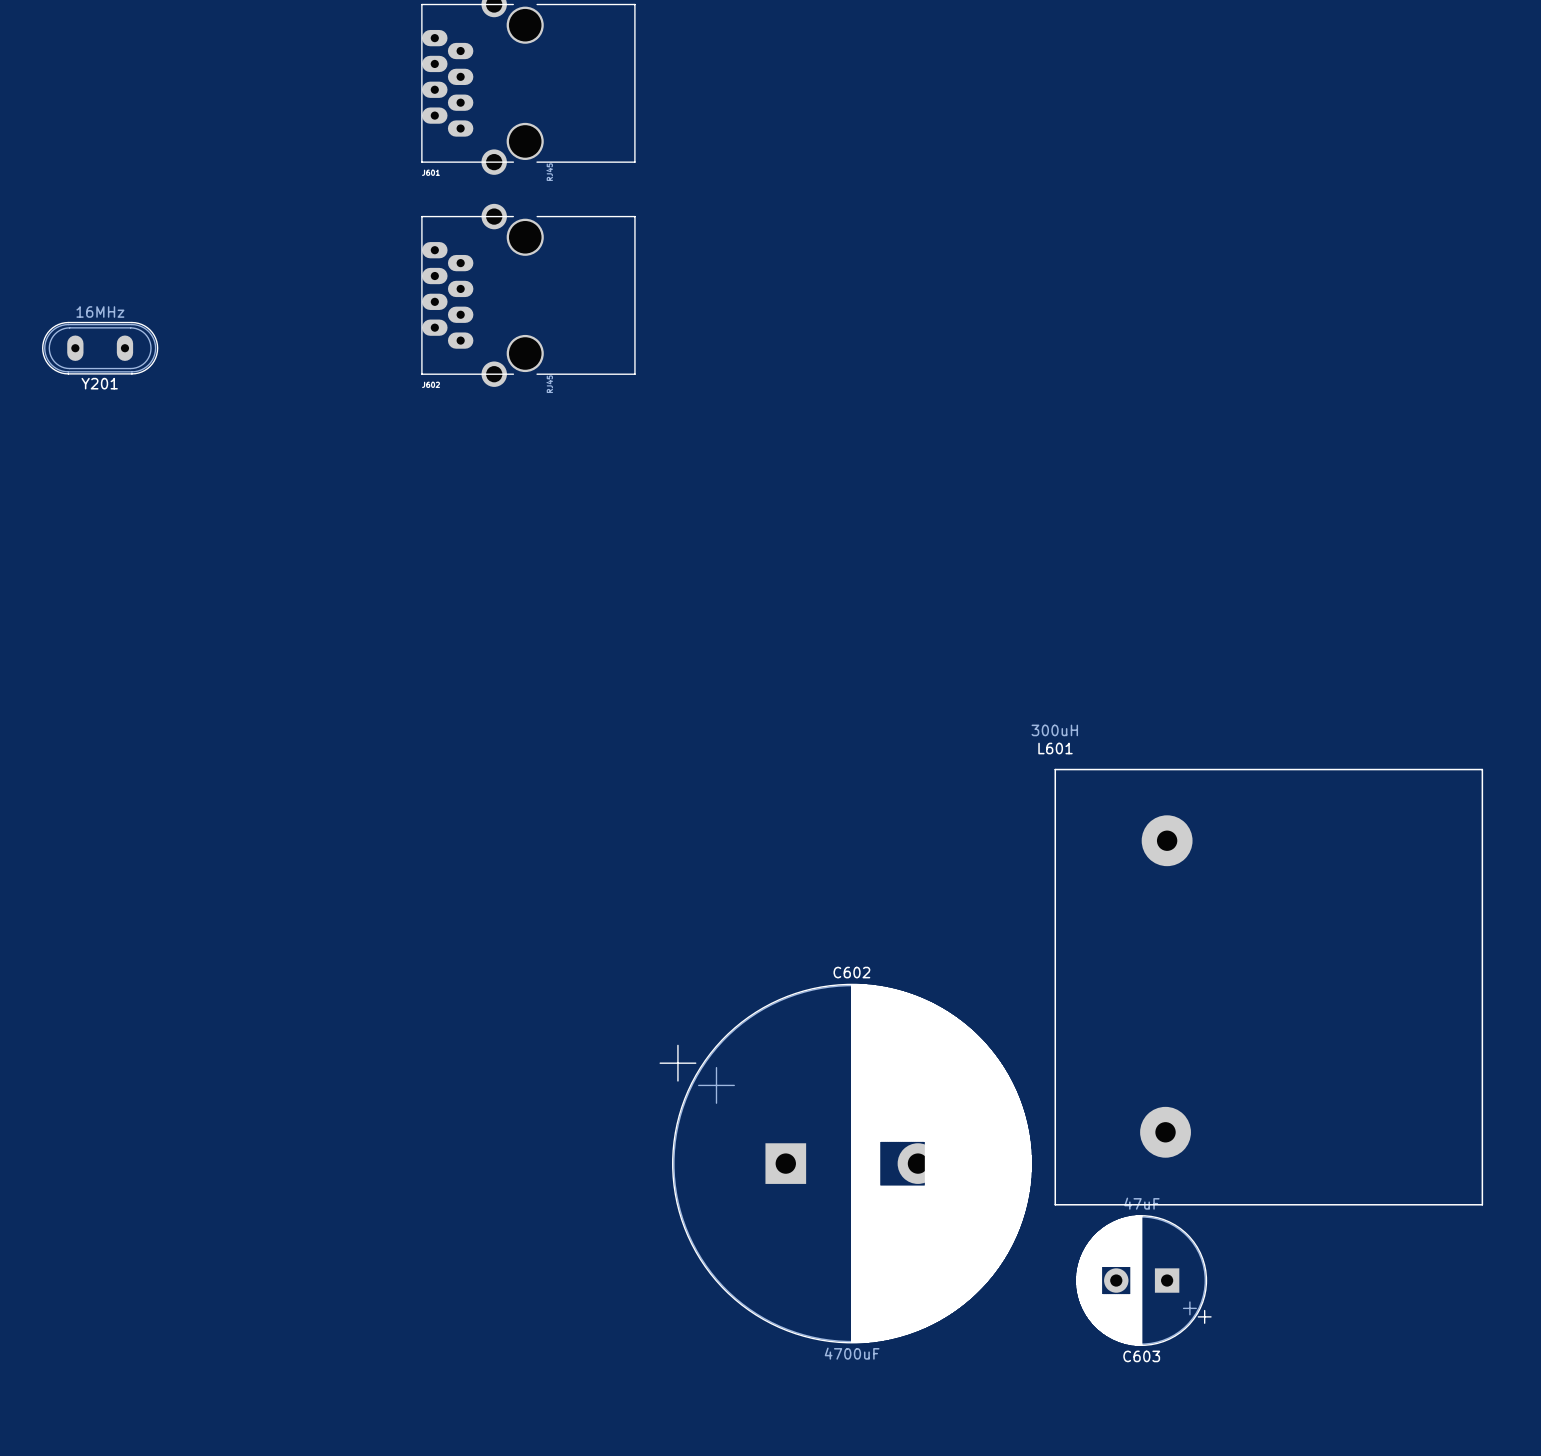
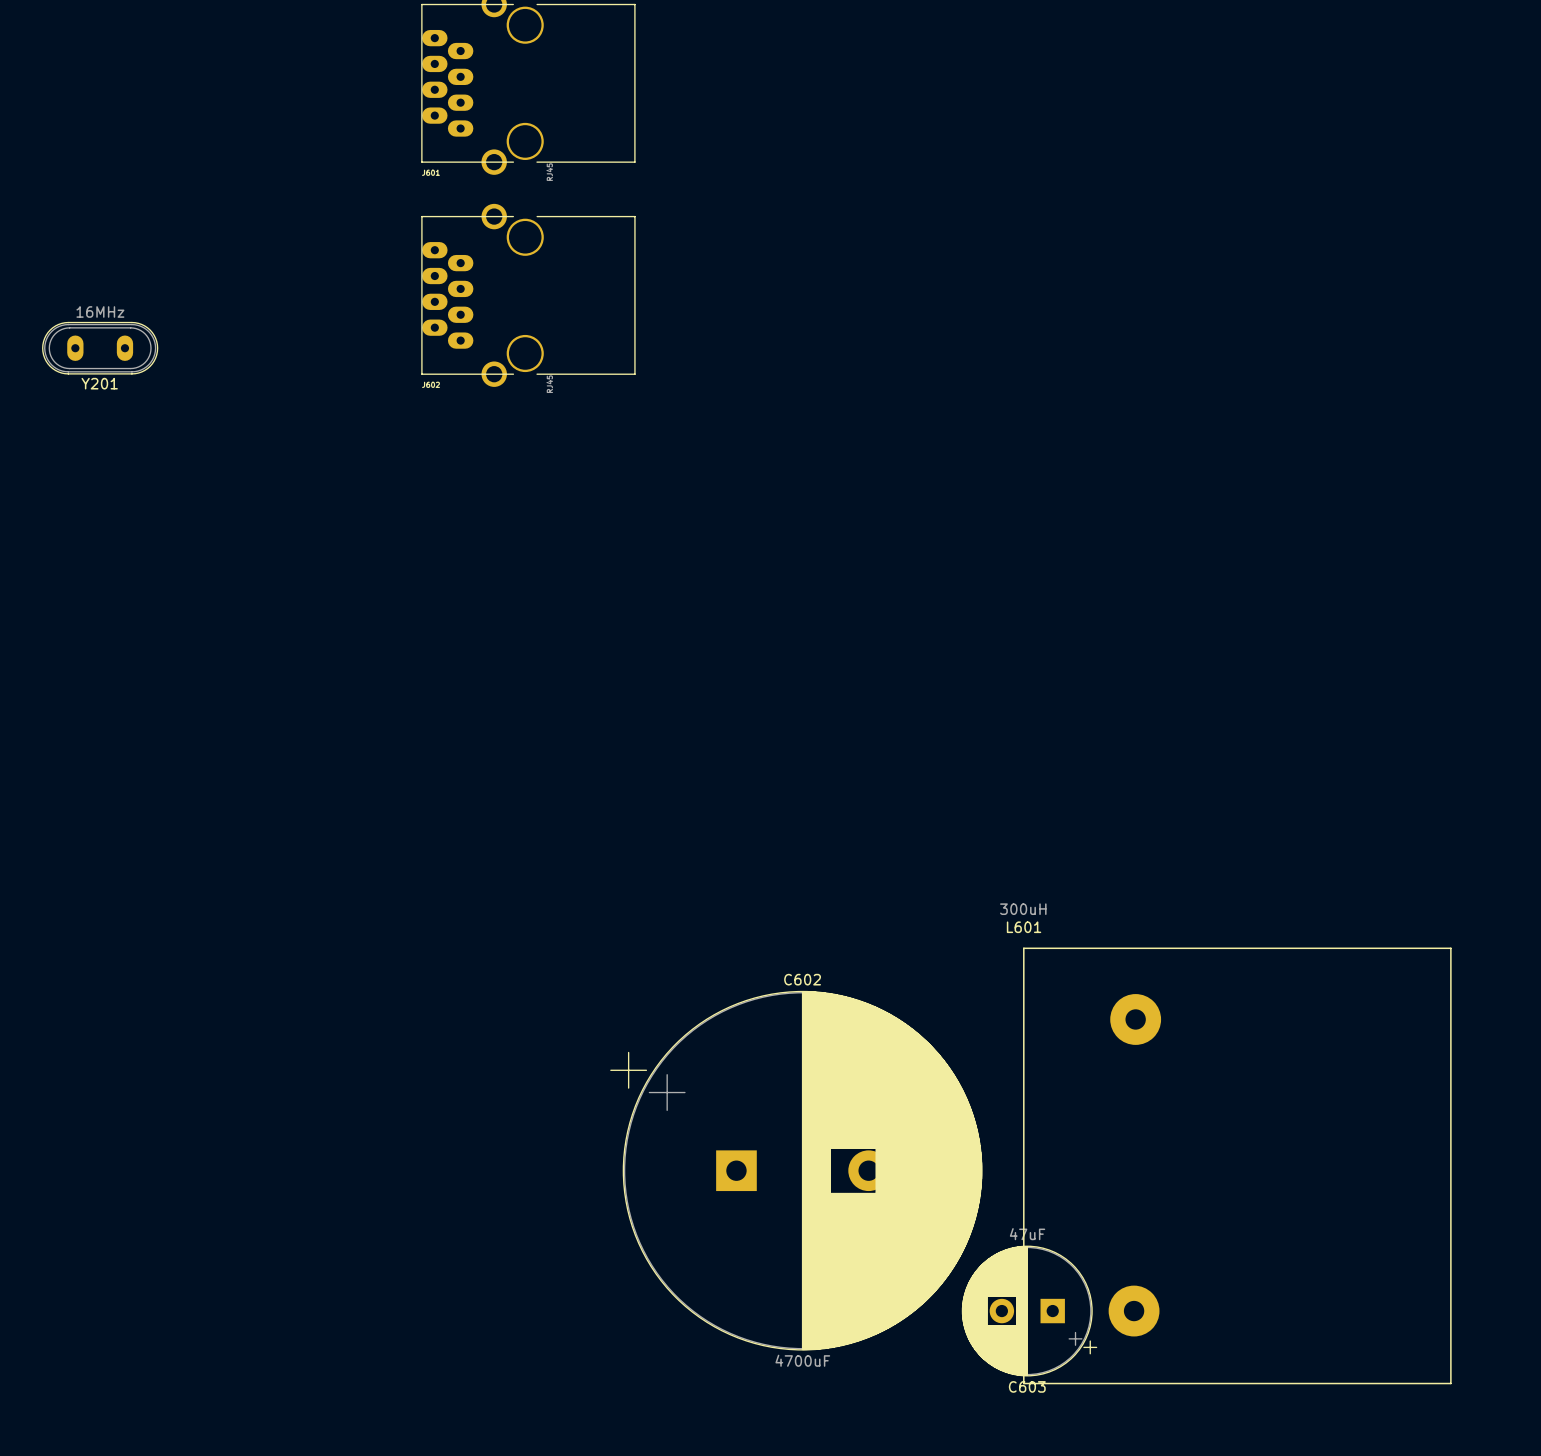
L601 position: (1268, 987) -> (1237, 1165)
C602 position: (845, 1163) -> (796, 1170)
C603 position: (1143, 1280) -> (1029, 1311)

